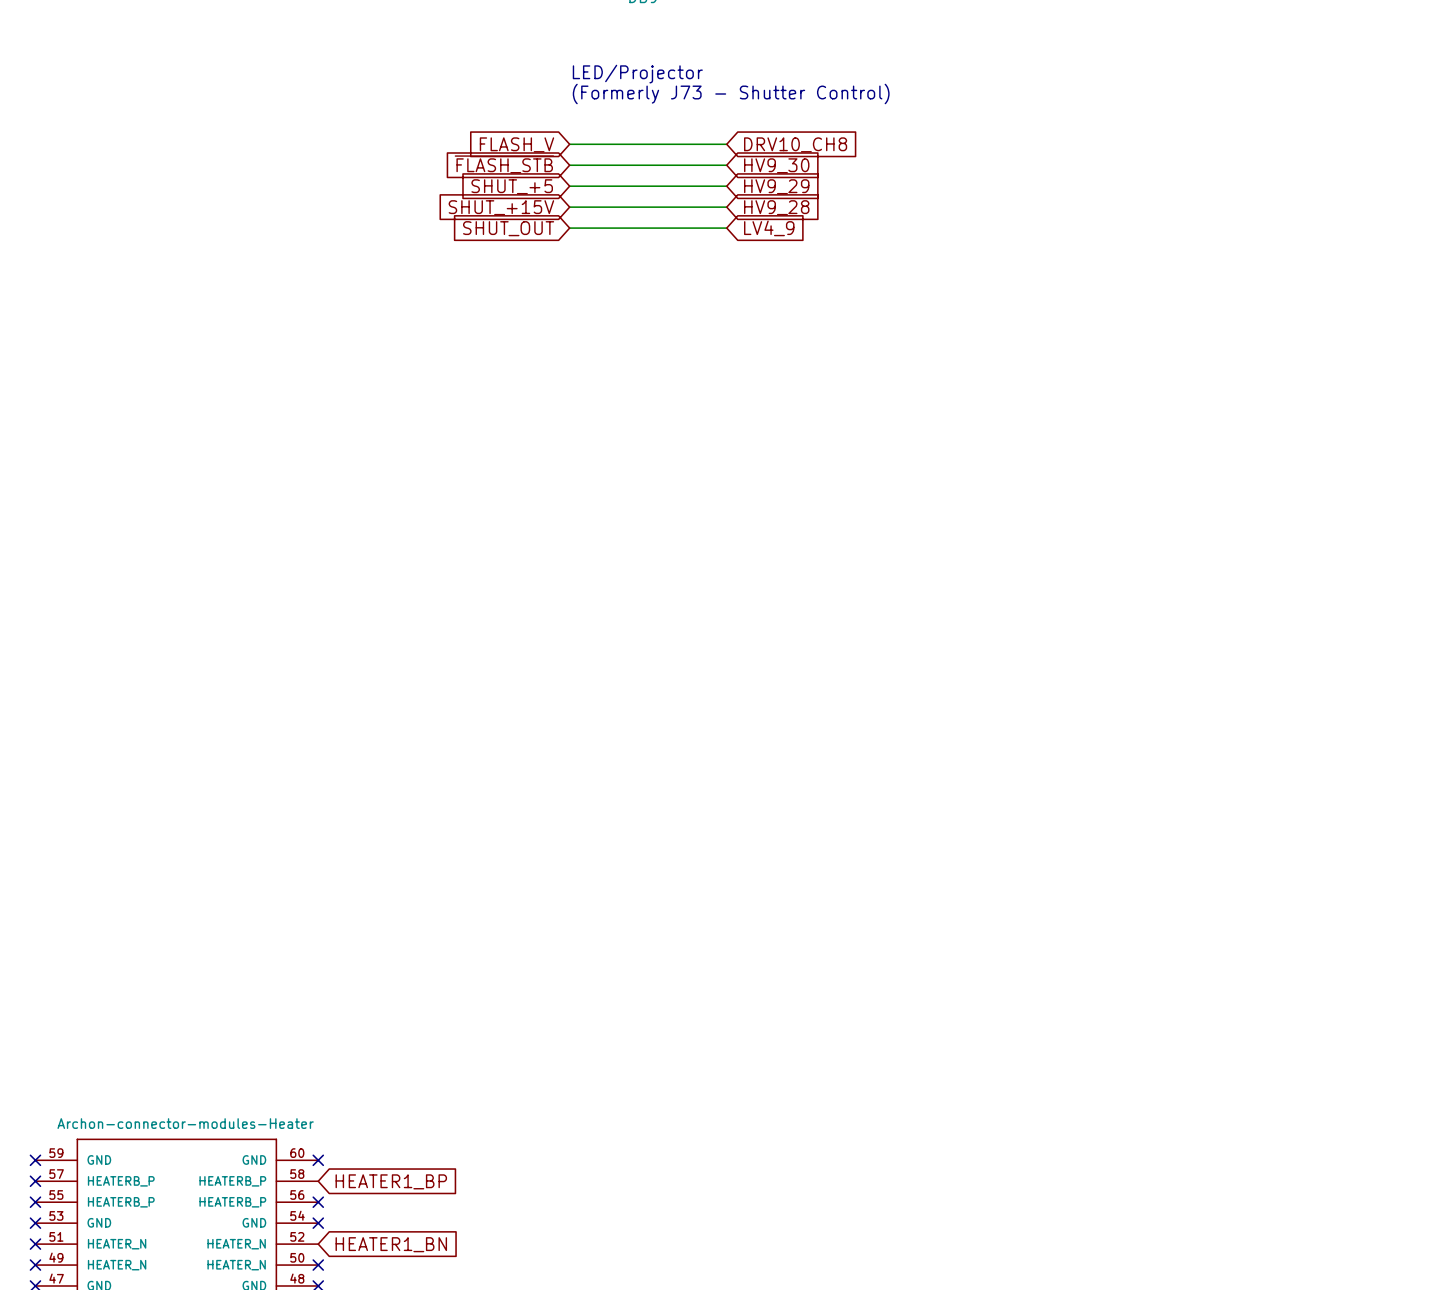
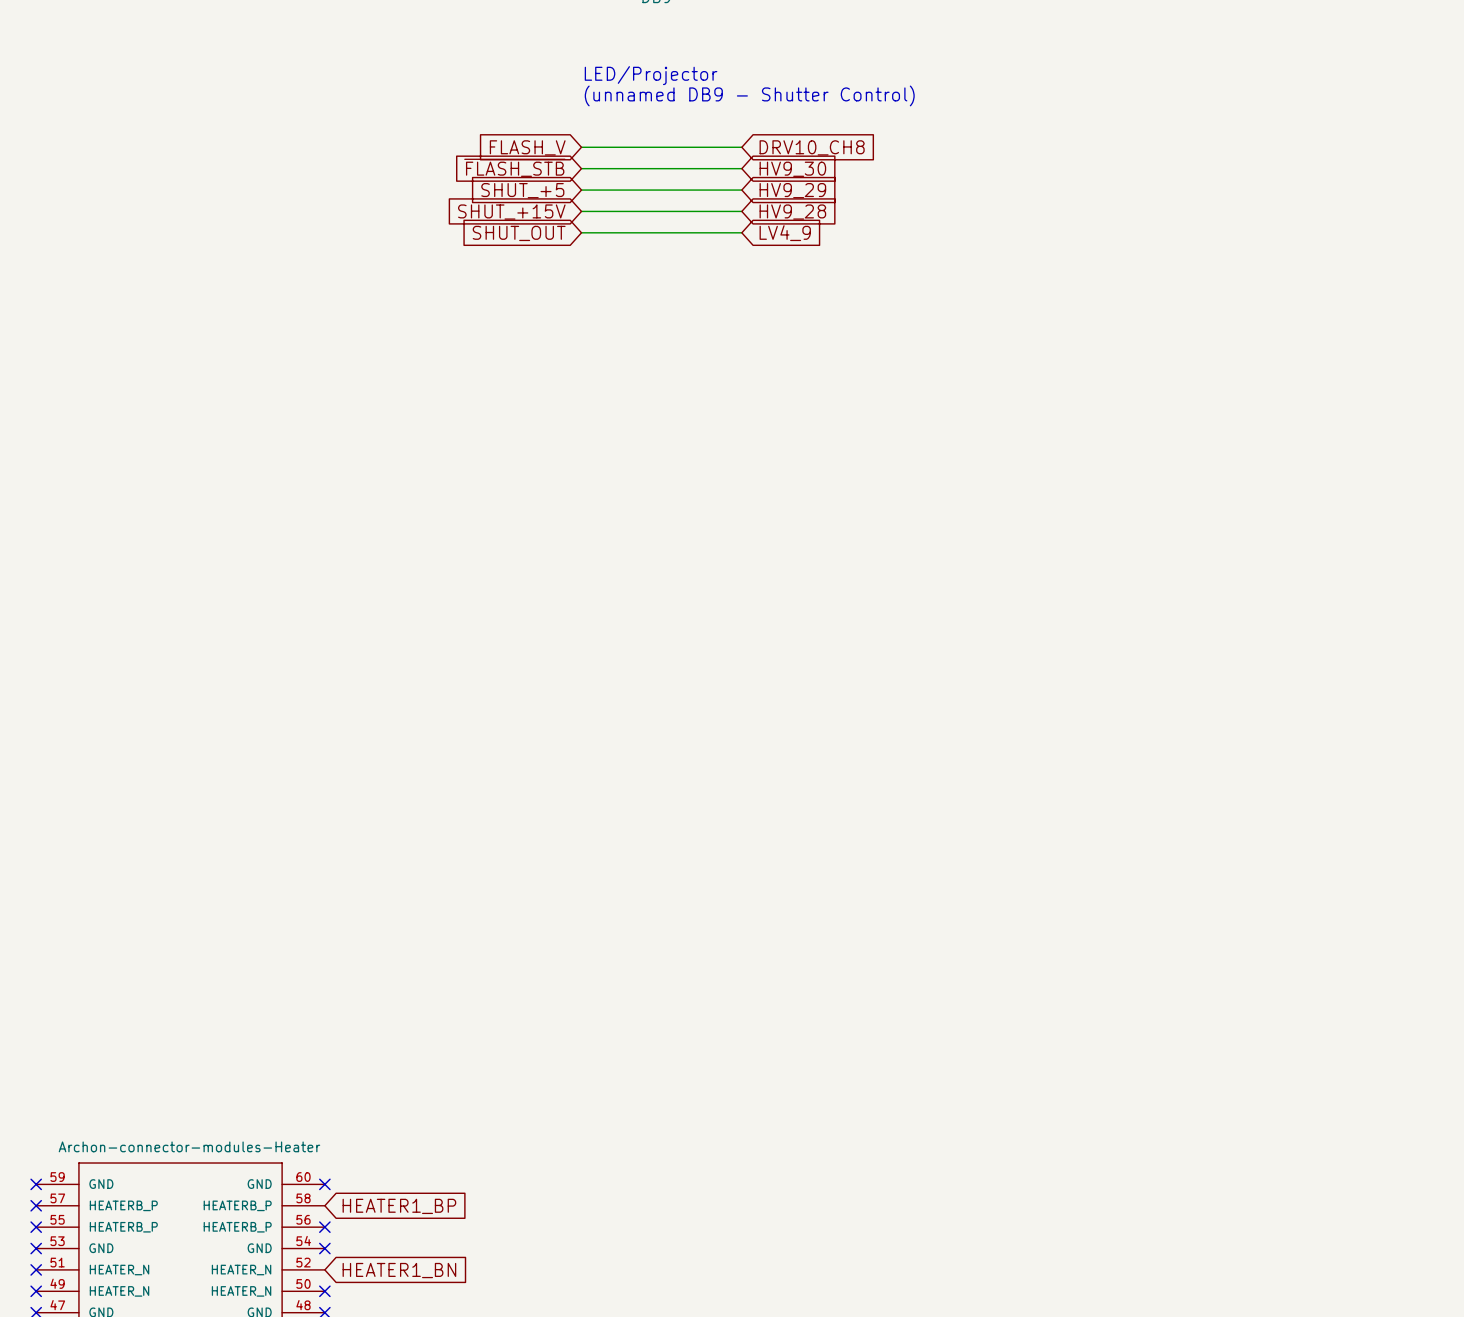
text: (Formerly J73 - Shutter Control) (731, 94) -> (unnamed DB9 - Shutter Control) (749, 95)

